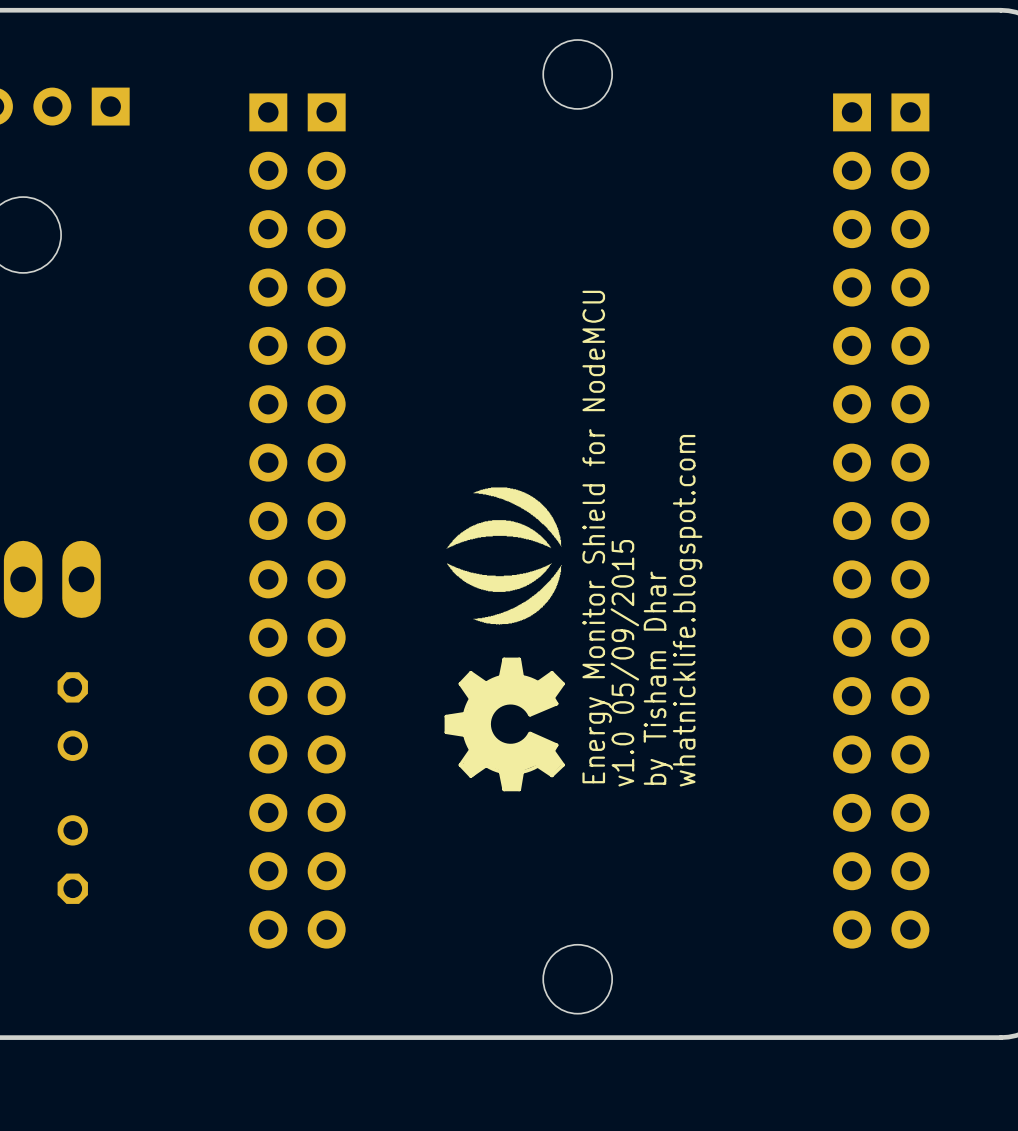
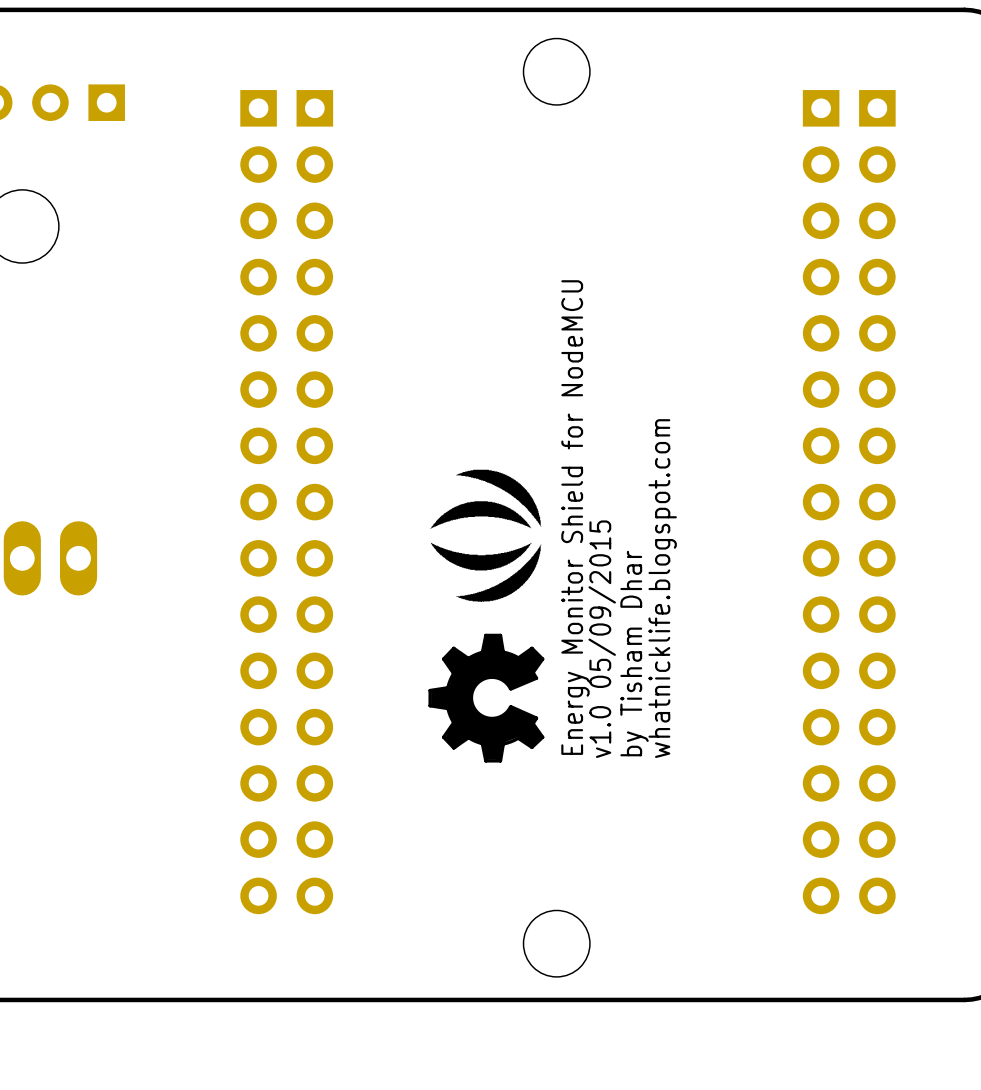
part: (72, 716) -> none
part: (72, 859) -> none

